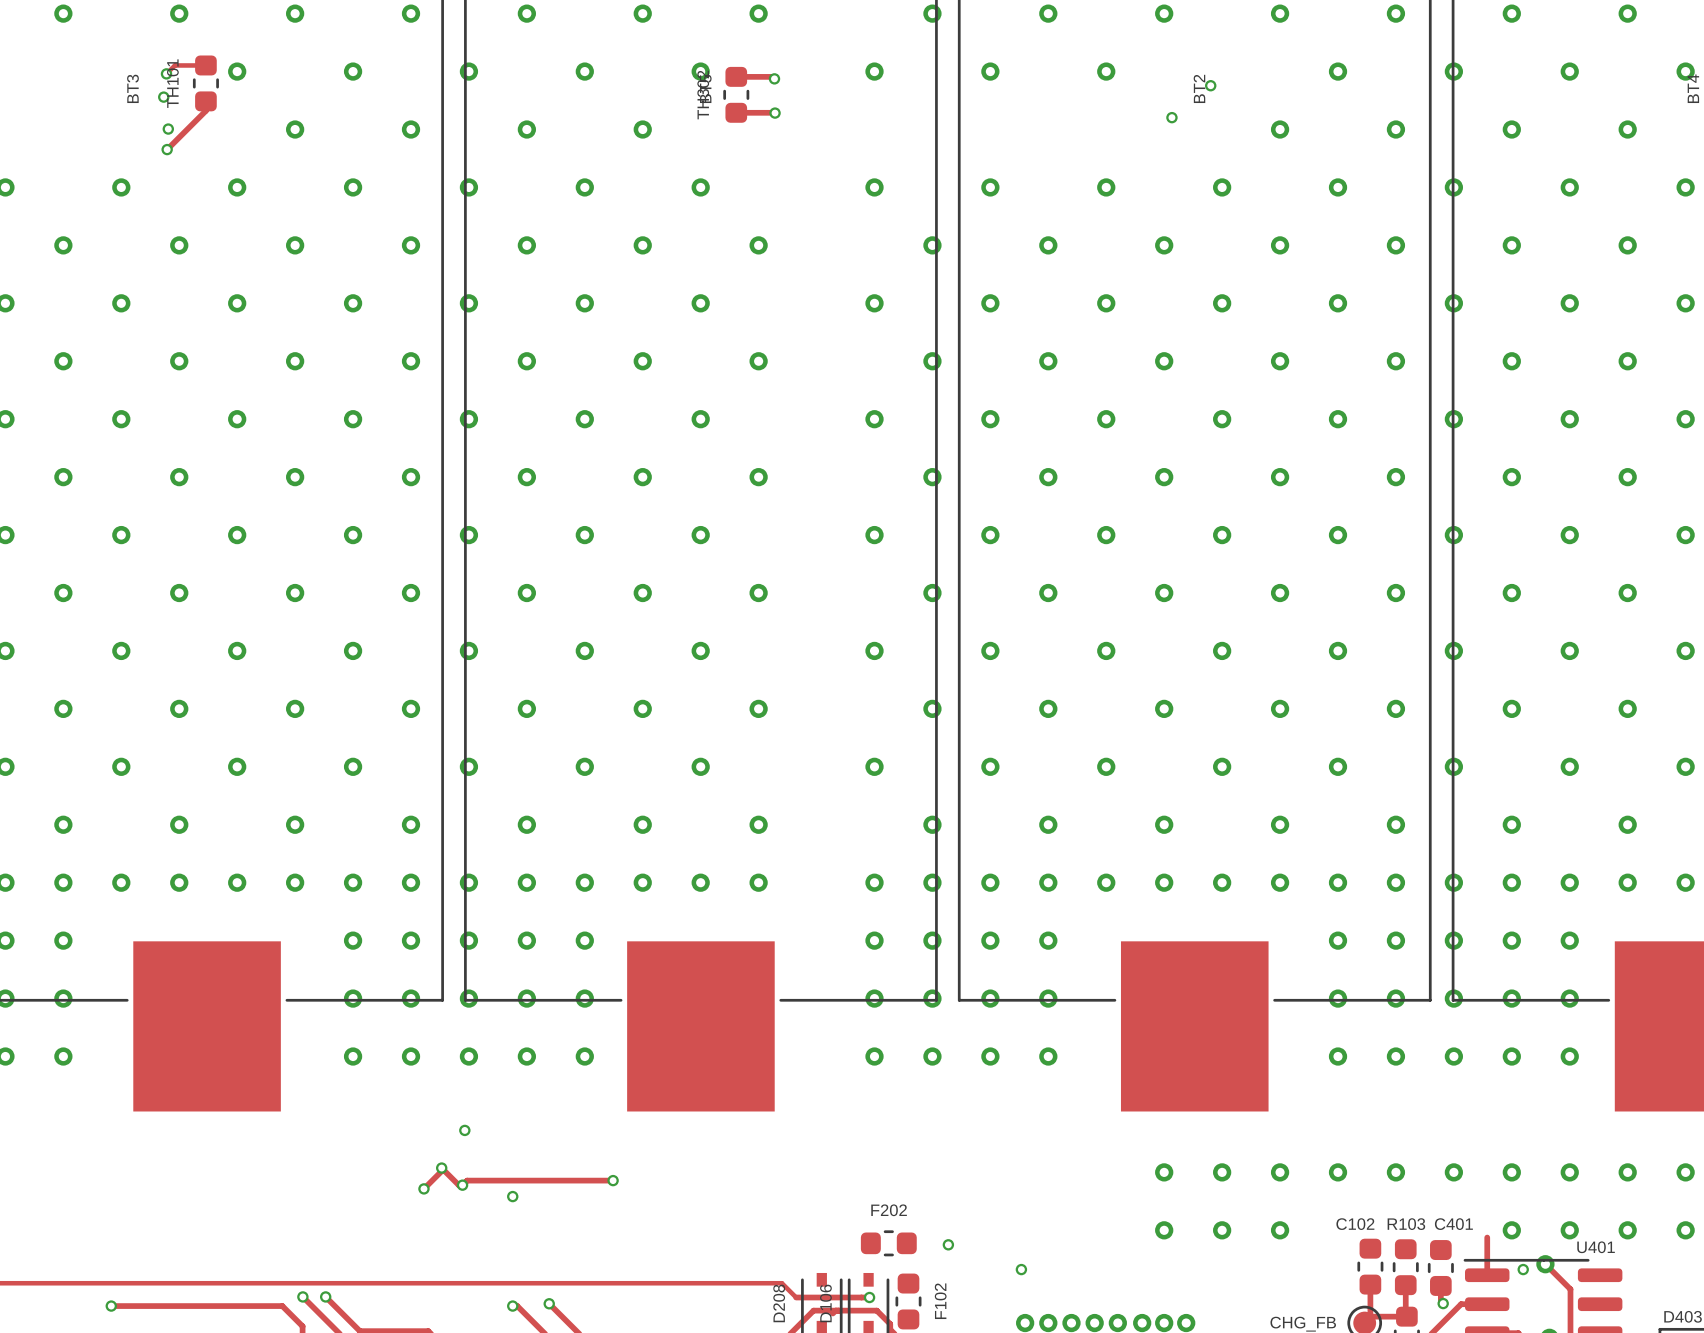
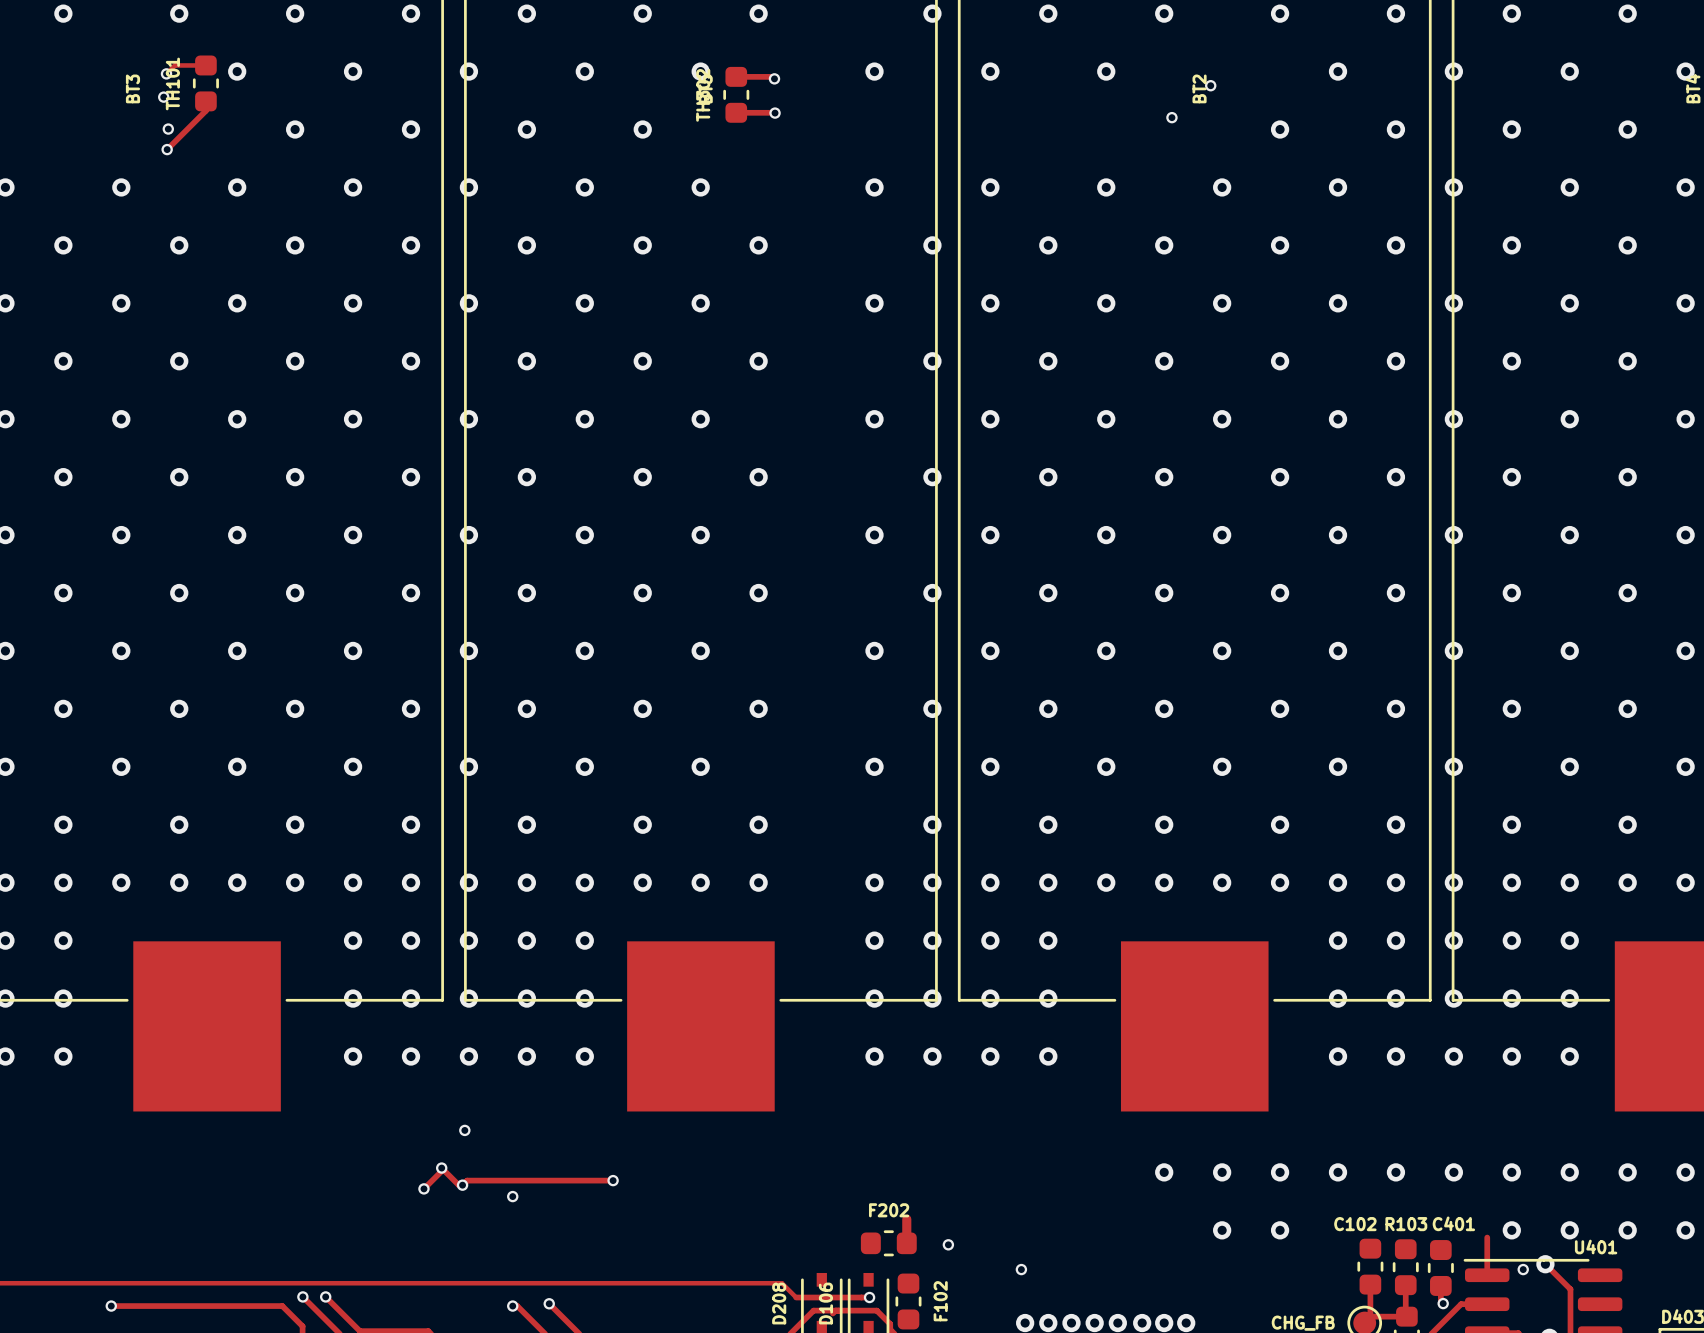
track: none -> (906, 1219) (906, 1243)
via: (1164, 1230) -> none

